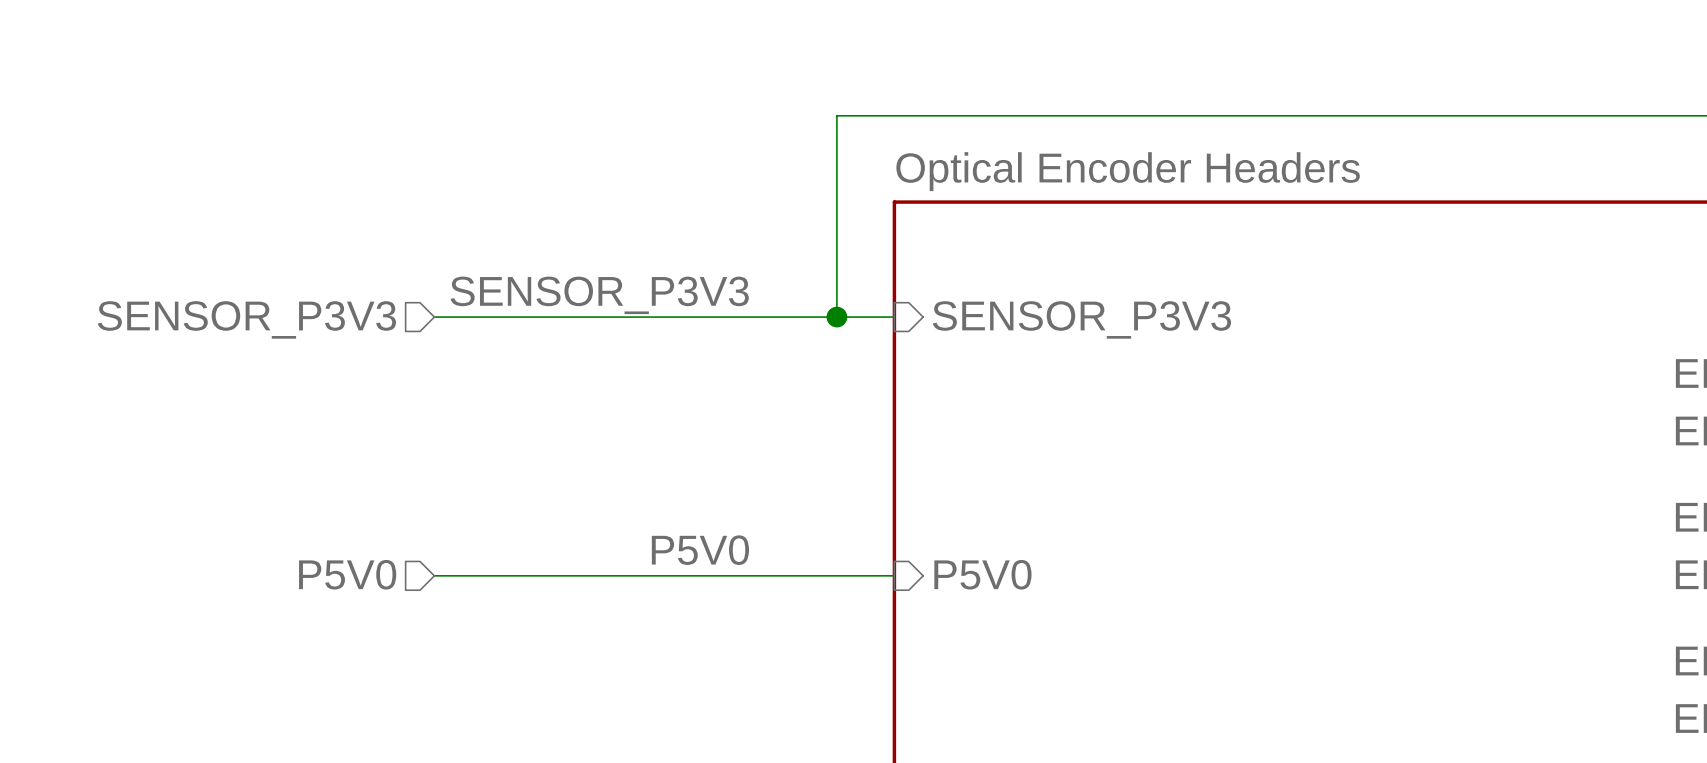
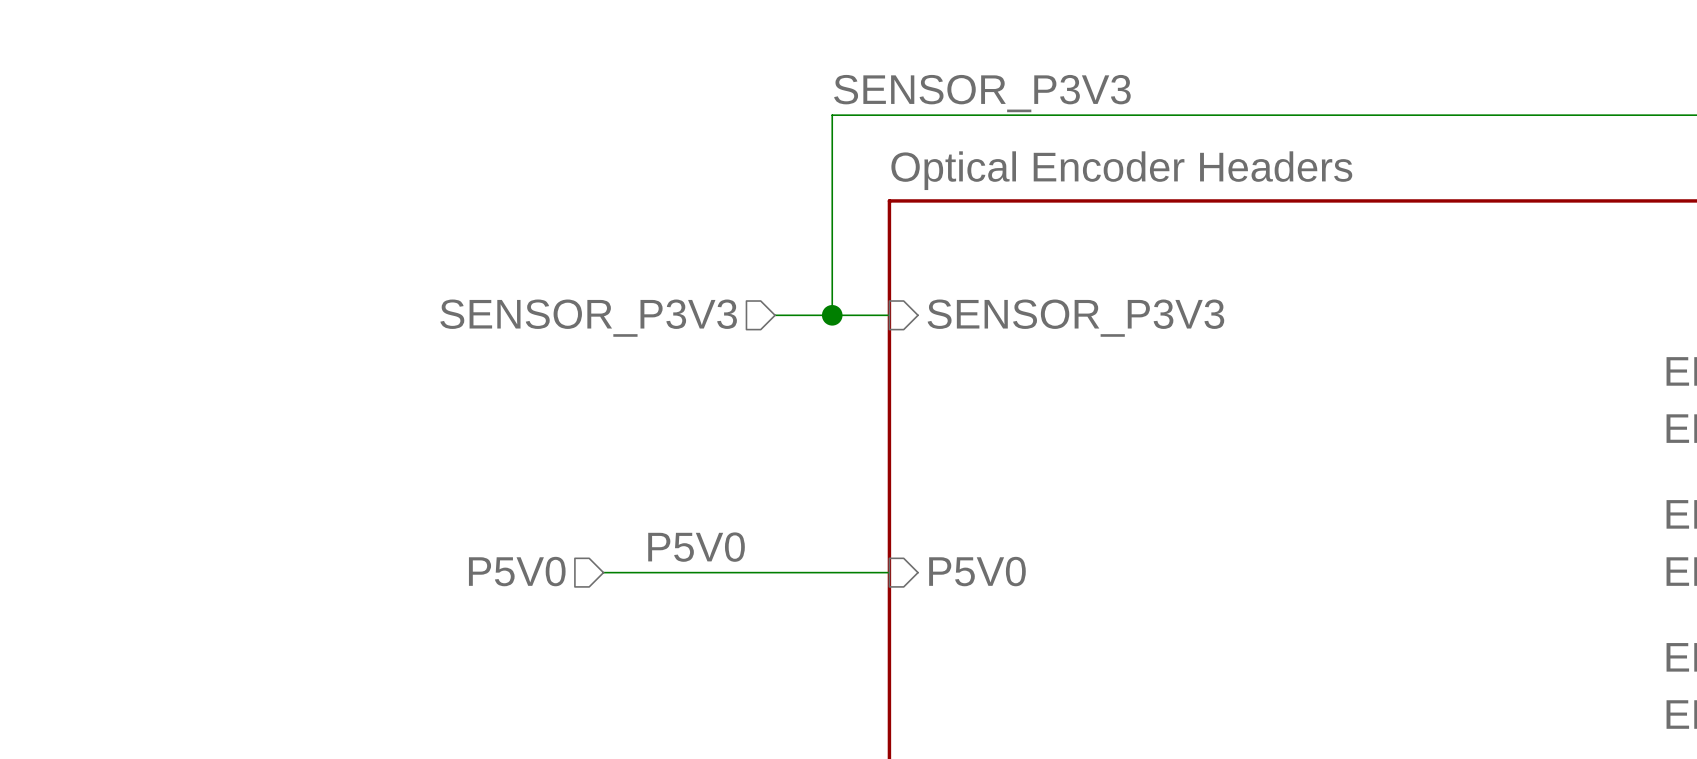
label position: SENSOR_P3V3 (599, 295) -> SENSOR_P3V3 (982, 93)
wire: (434, 317) (779, 317) -> none
hierarchical label position: SENSOR_P3V3 (246, 319) -> SENSOR_P3V3 (588, 318)
hierarchical label position: P5V0 (347, 574) -> P5V0 (517, 571)
wire: (434, 575) (606, 575) -> none

